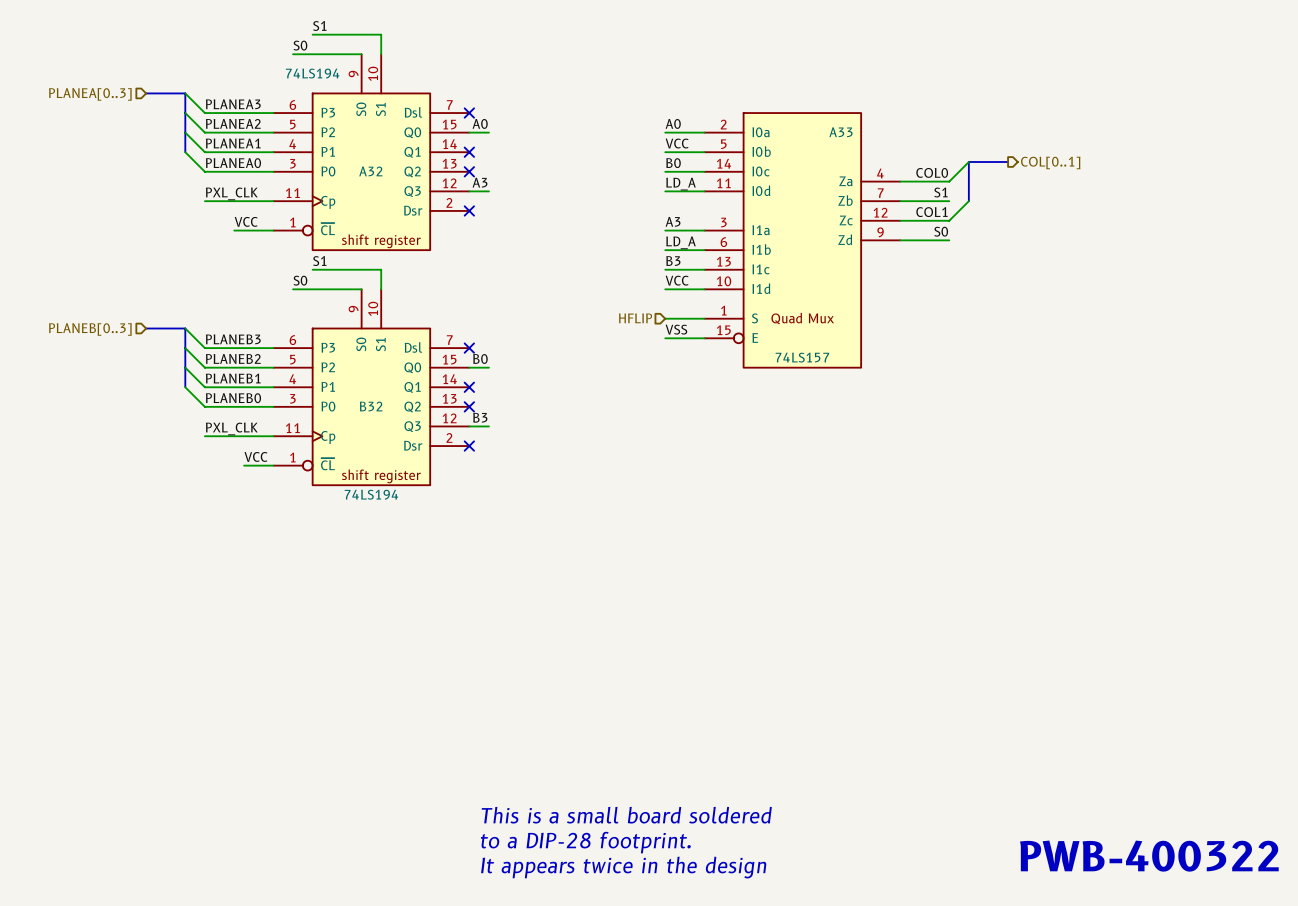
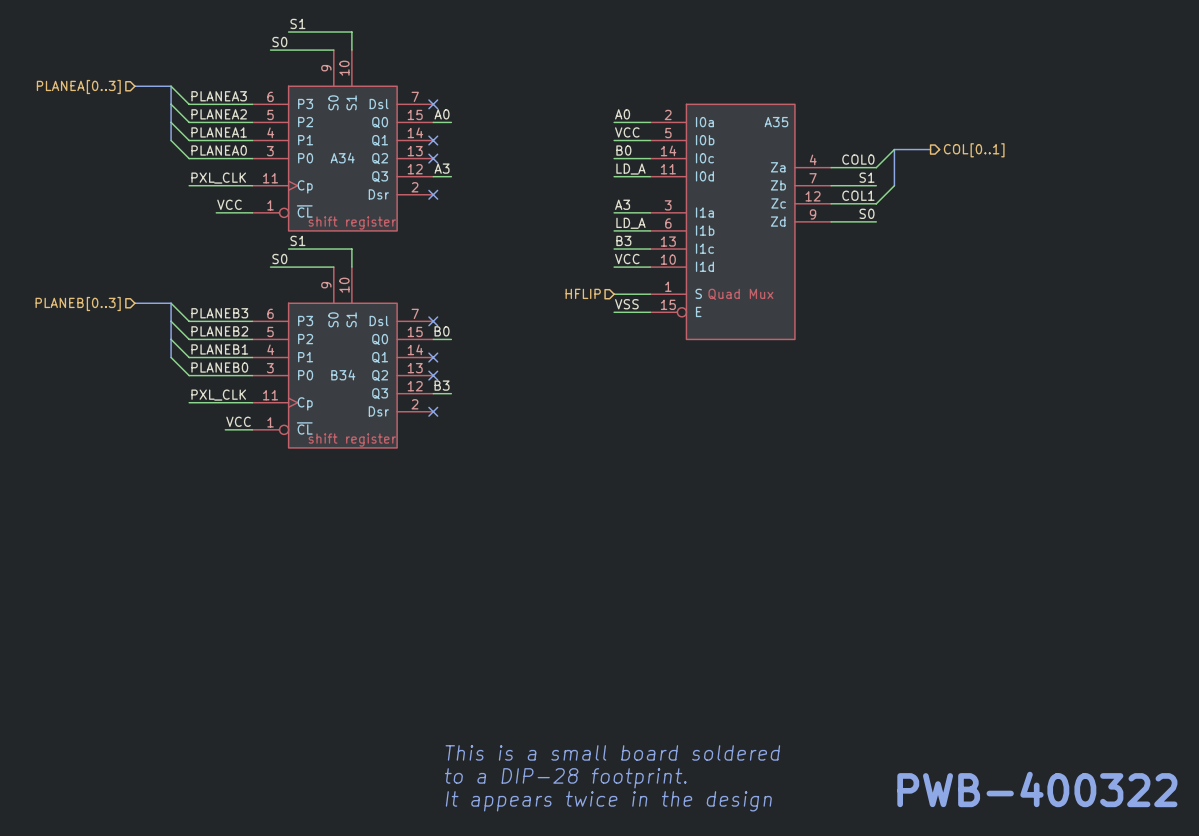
A32 value: 74LS194 (312, 73) -> none
A33 name: A33 (840, 132) -> A35 (776, 122)
A32 name: A32 (370, 171) -> A34 (342, 158)
A33 value: 74LS157 (802, 357) -> none
B32 name: B32 (371, 406) -> B34 (343, 375)
B32 value: 74LS194 (371, 494) -> none

